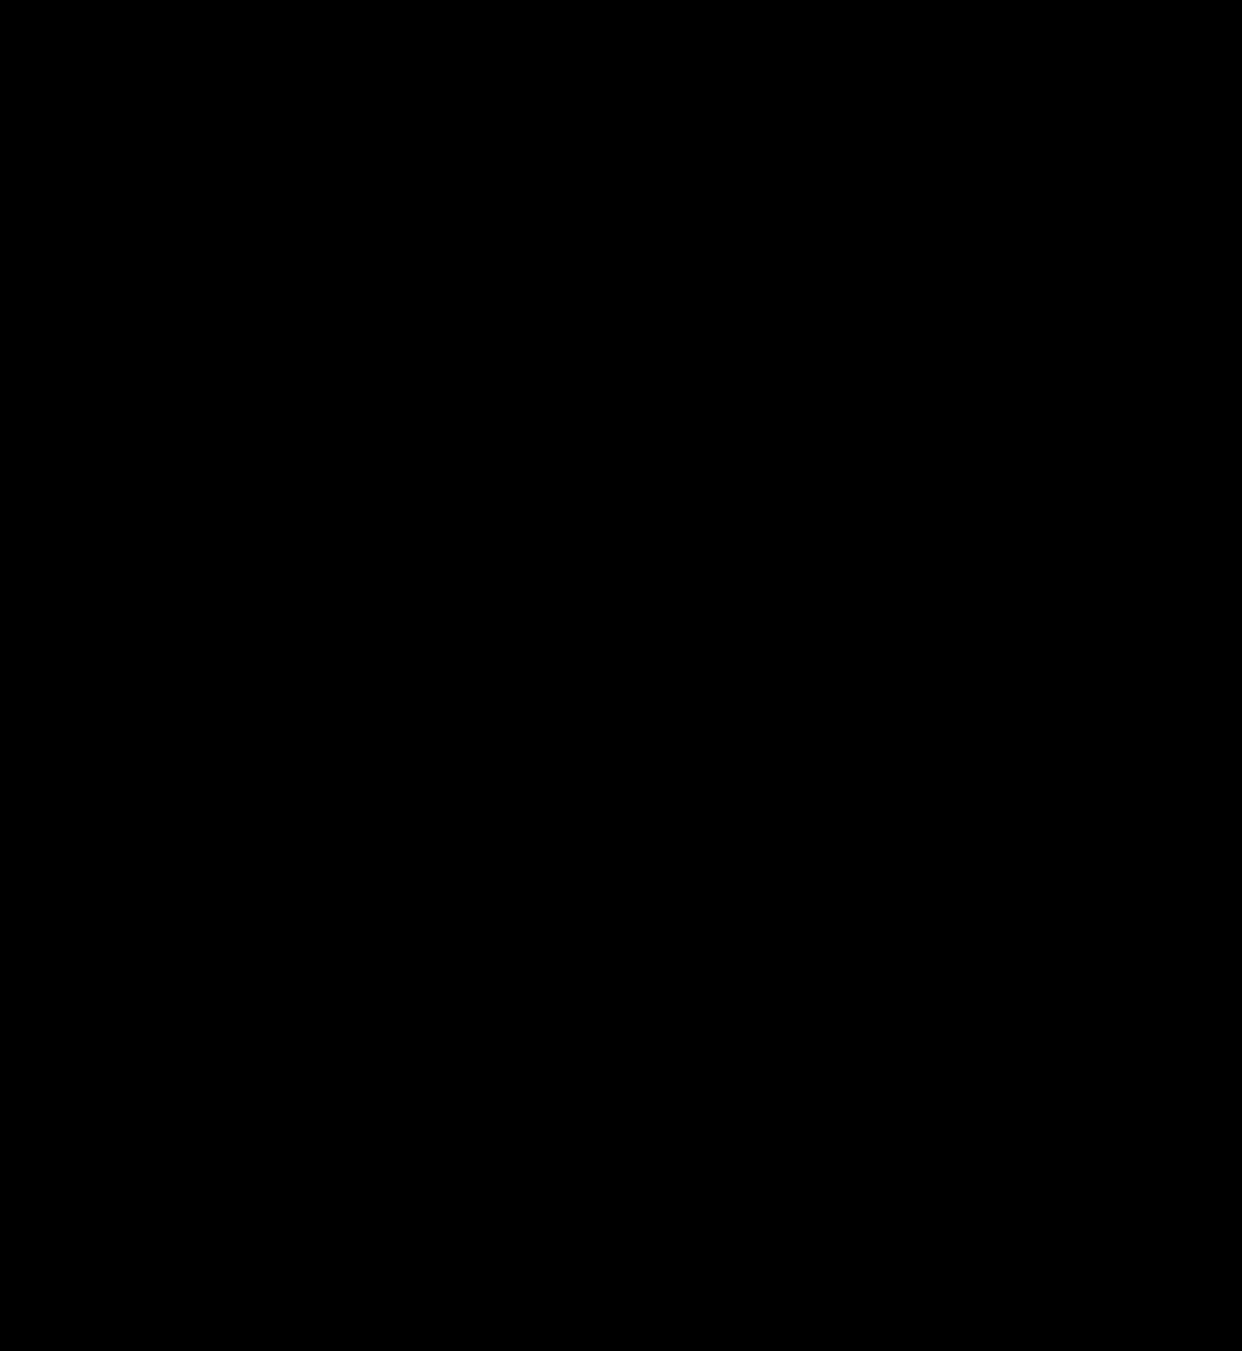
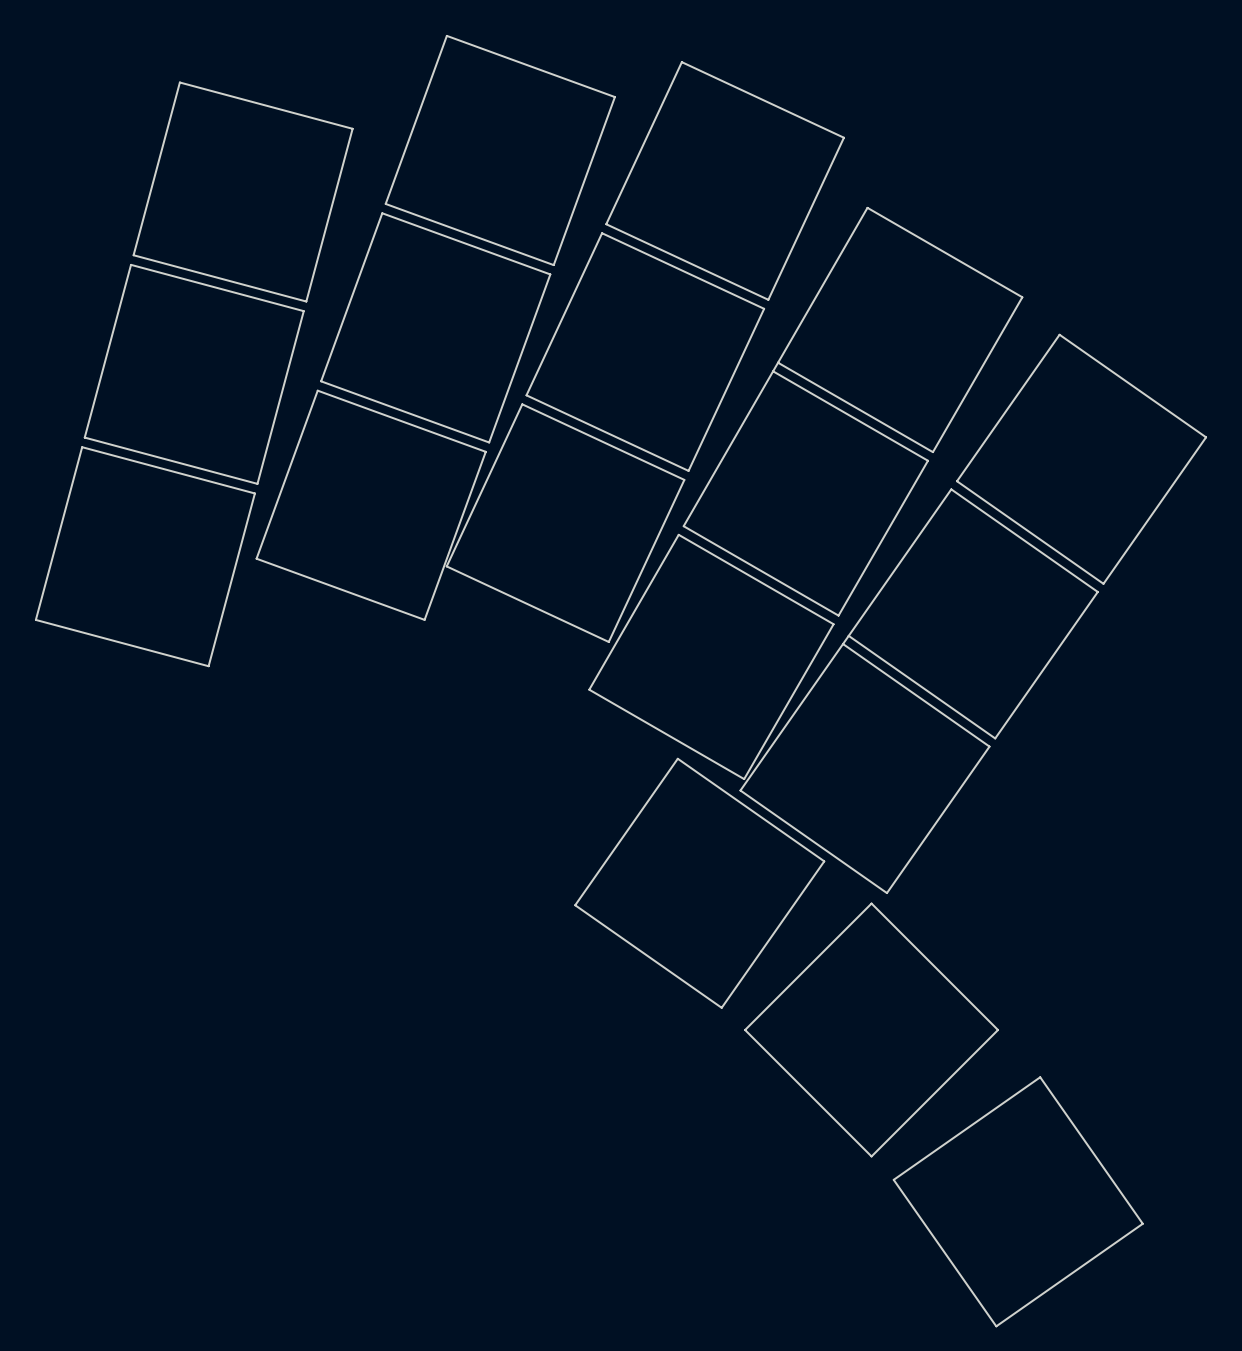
board edge: none -> (446, 35) (385, 203) (553, 265) (614, 97) (446, 35)
board edge: none -> (681, 62) (606, 224) (768, 299) (843, 137) (681, 62)
board edge: none -> (179, 82) (133, 255) (306, 301) (352, 128) (179, 82)
board edge: none -> (382, 213) (550, 274) (489, 442) (321, 381) (382, 213)
board edge: none -> (602, 233) (764, 308) (688, 470) (526, 395) (602, 233)
board edge: none -> (131, 264) (303, 311) (257, 483) (84, 437) (131, 264)
board edge: none -> (1059, 334) (957, 481) (1103, 583) (1206, 437) (1059, 334)
board edge: none -> (778, 362) (932, 452) (1022, 297) (867, 207) (683, 526) (838, 615) (927, 460) (773, 371)
board edge: none -> (317, 390) (485, 451) (424, 619) (256, 558) (317, 390)
board edge: none -> (522, 404) (684, 479) (608, 641) (446, 566) (522, 404)
board edge: none -> (82, 447) (35, 619) (208, 666) (254, 493) (82, 447)
board edge: none -> (678, 534) (589, 689) (744, 779) (833, 624) (678, 534)
board edge: none -> (848, 635) (995, 738) (1097, 591) (951, 489) (740, 790) (886, 893) (989, 746) (843, 644)
board edge: none -> (677, 758) (575, 905) (721, 1007) (824, 861) (677, 758)
board edge: none -> (871, 903) (998, 1030) (871, 1156) (745, 1030) (871, 903)
board edge: none -> (1040, 1077) (1142, 1223) (996, 1326) (893, 1179) (1040, 1077)

